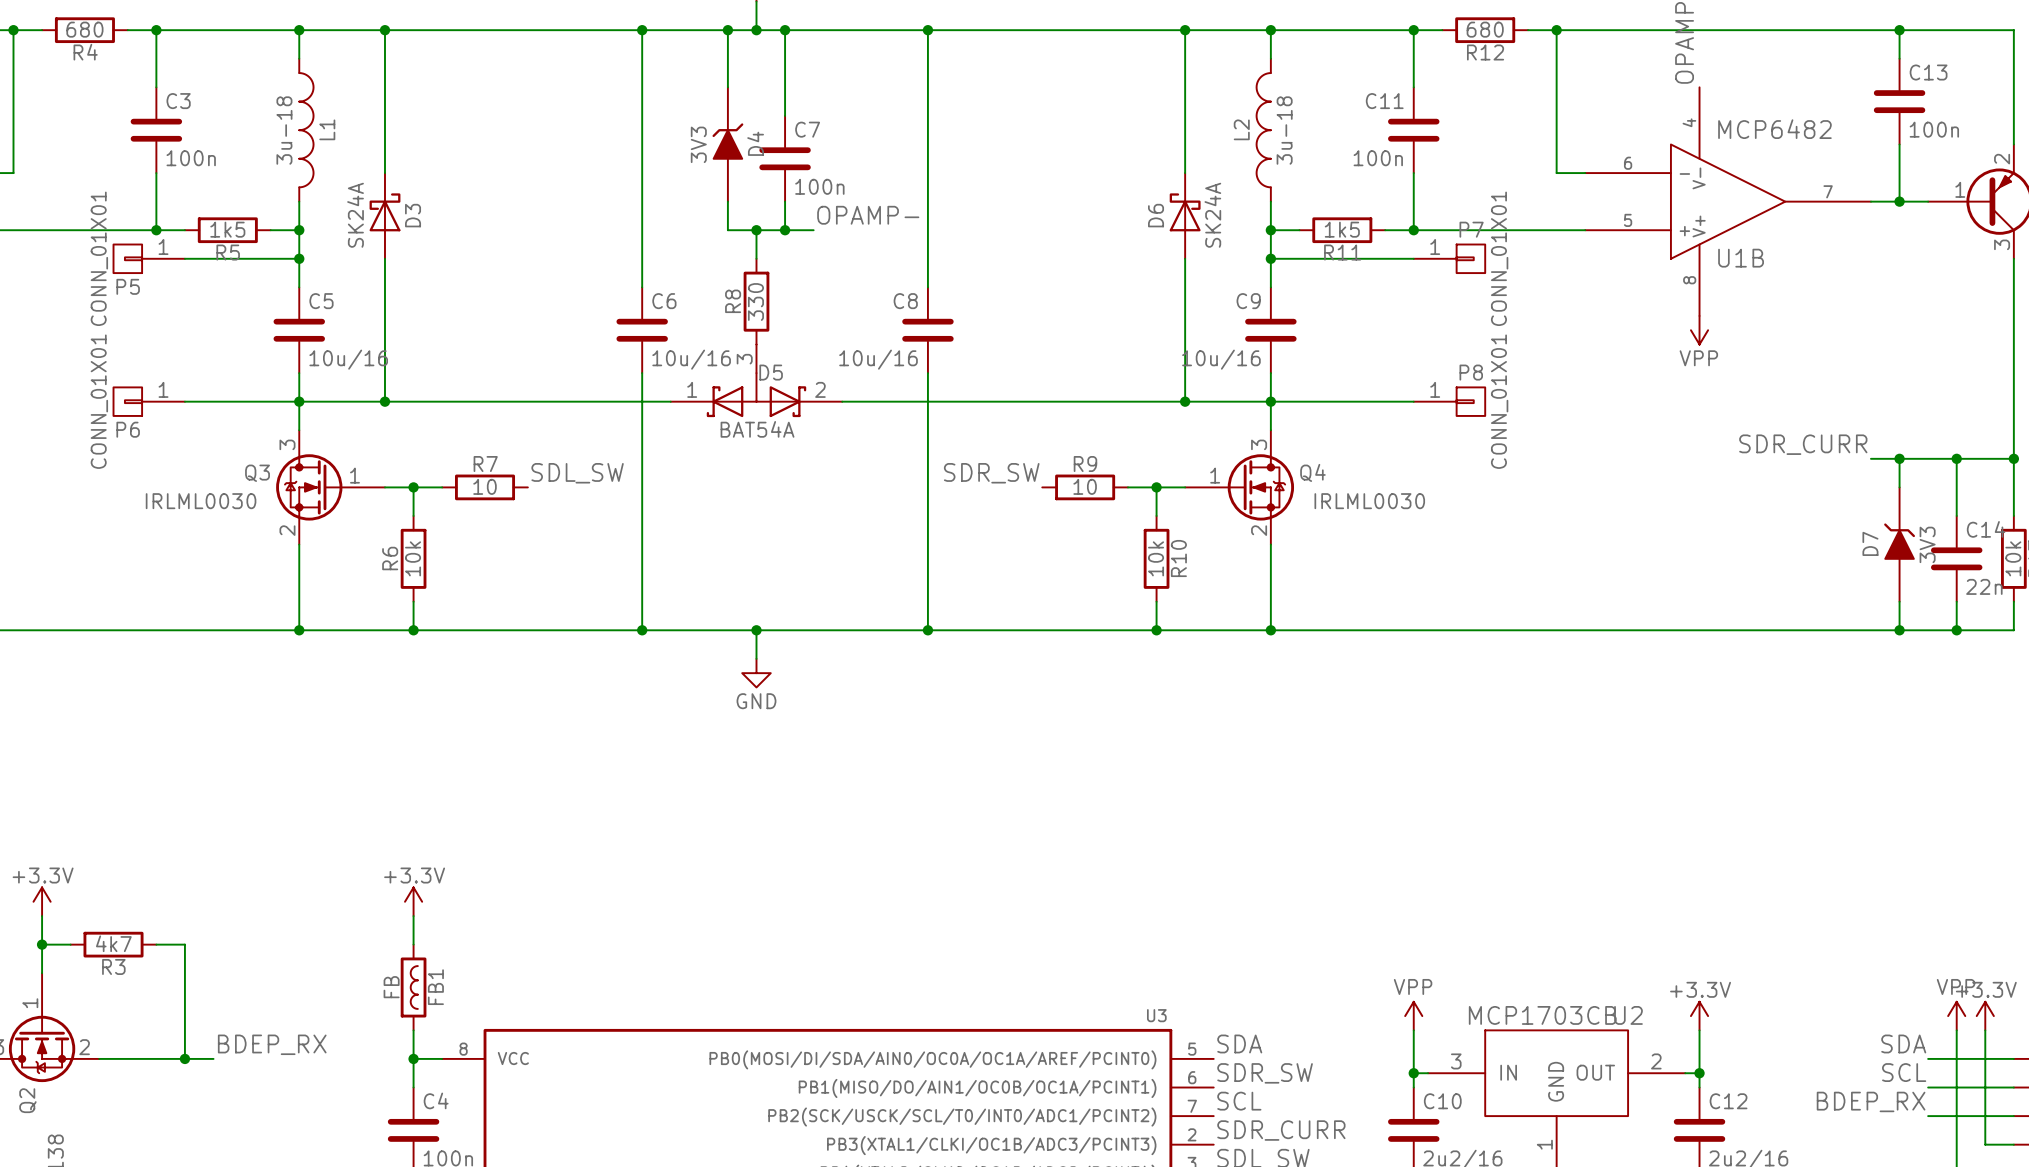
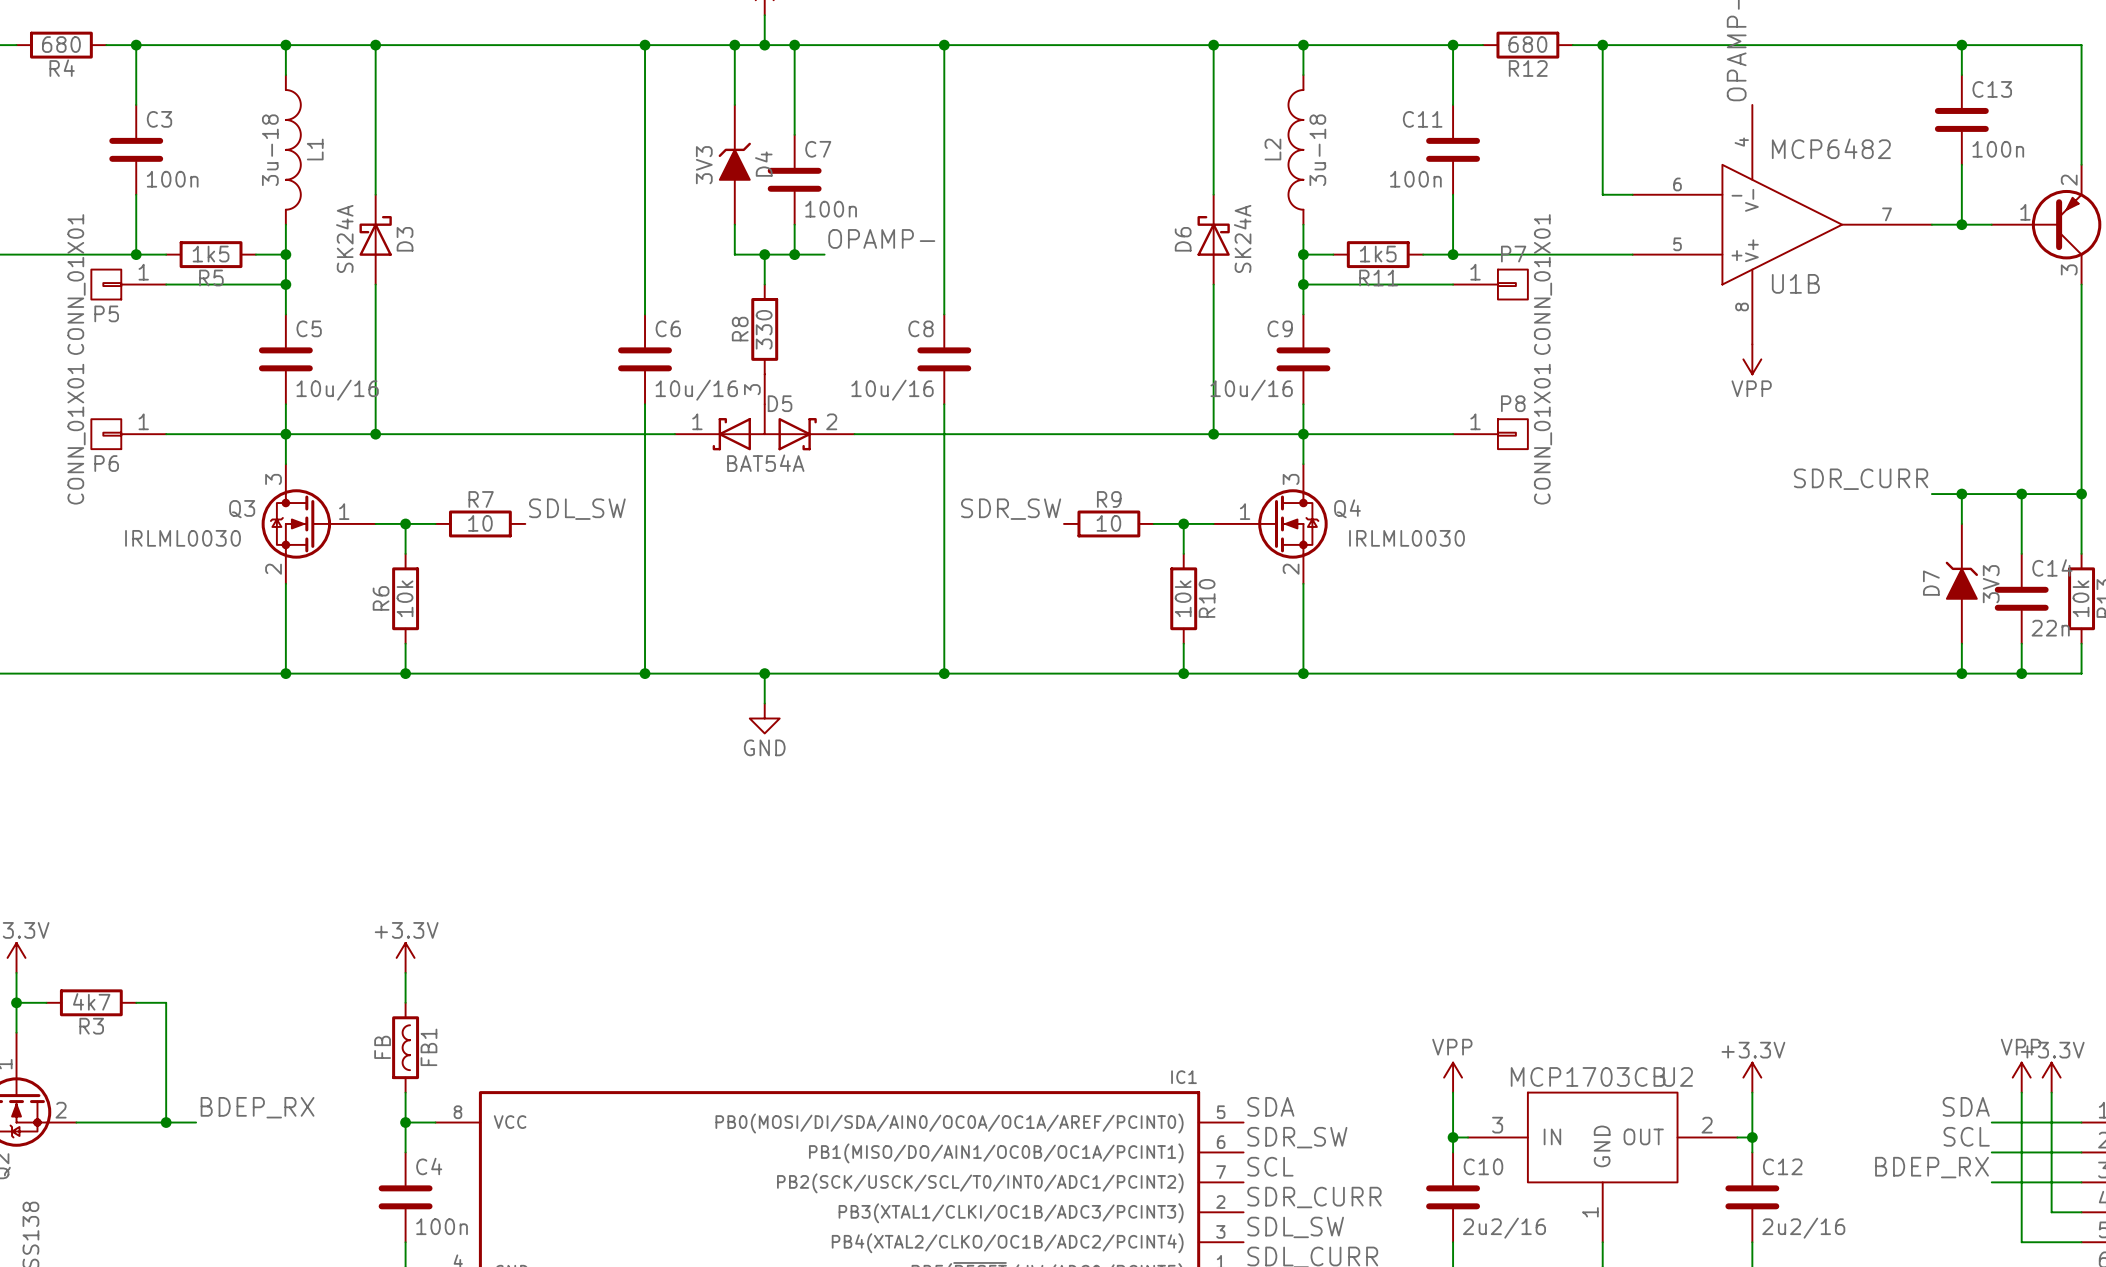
U3 name: U3 (1156, 1015) -> IC1 (1184, 1077)

